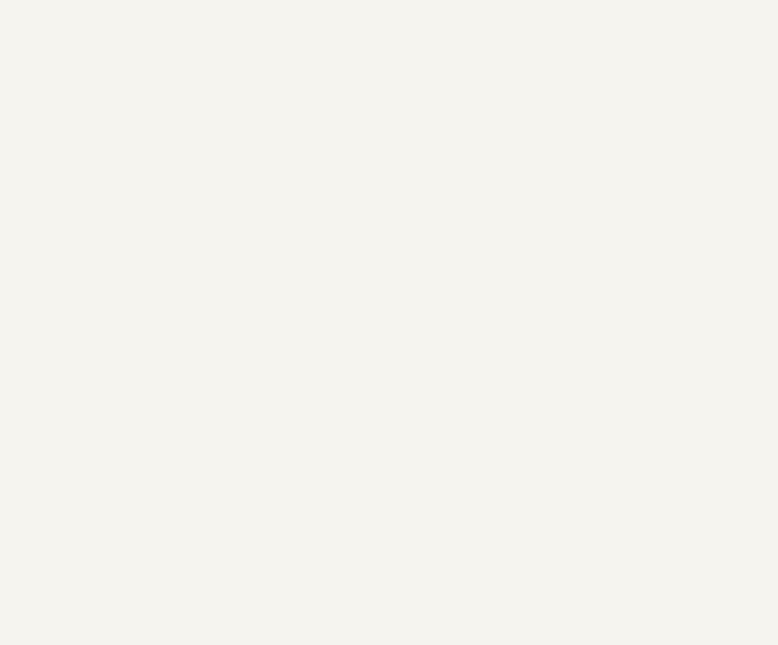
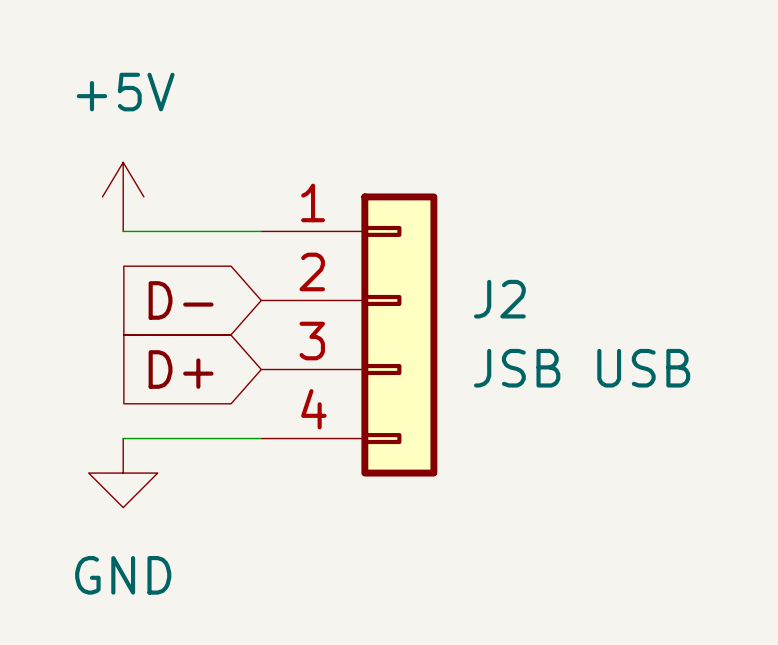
power symbol: none -> +5V (123, 196)
wire: none -> (123, 231) (261, 231)
global label: none -> D- (181, 300)
J2: none -> JSB USB (349, 334)
global label: none -> D+ (181, 369)
wire: none -> (123, 438) (261, 438)
power symbol: none -> GND (123, 473)

